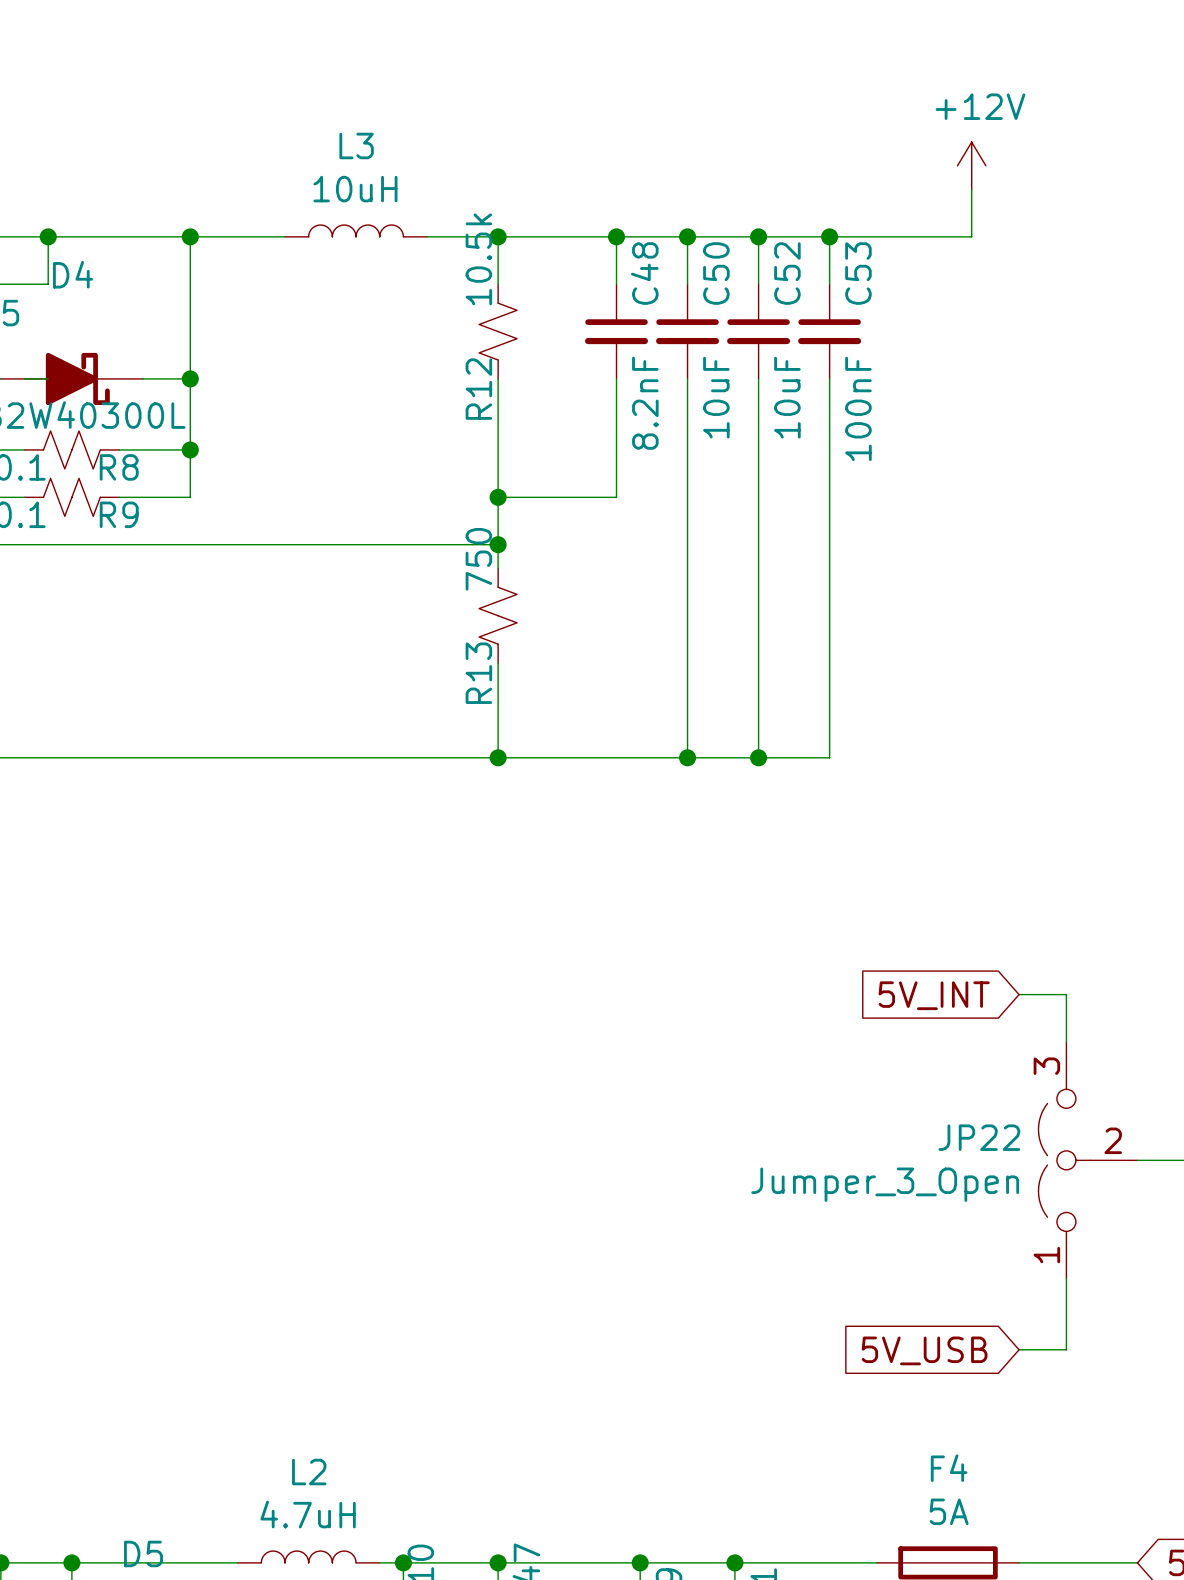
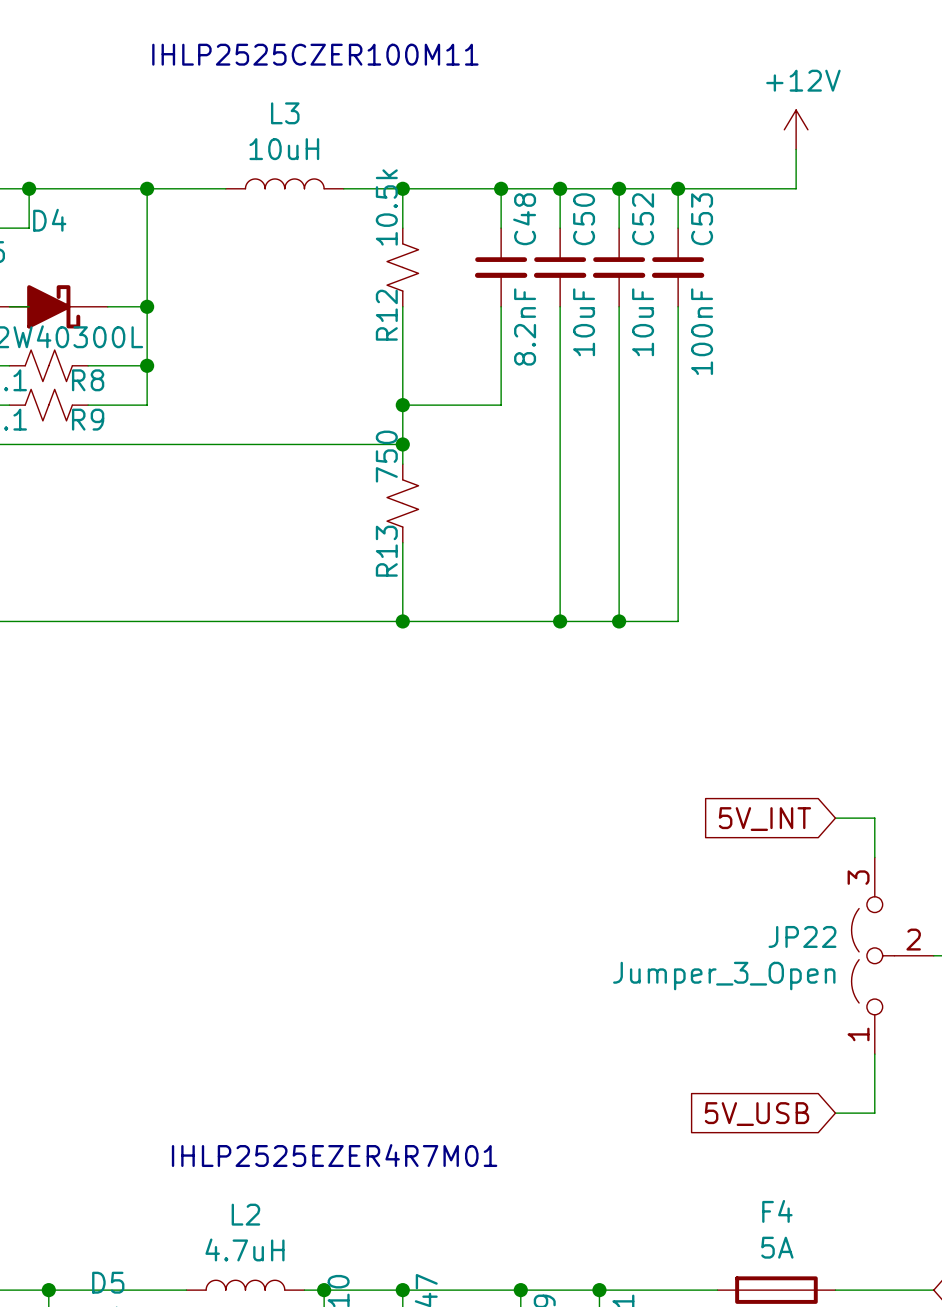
text: none -> IHLP2525CZER100M11 (315, 54)
text: none -> IHLP2525EZER4R7M01 (334, 1155)

